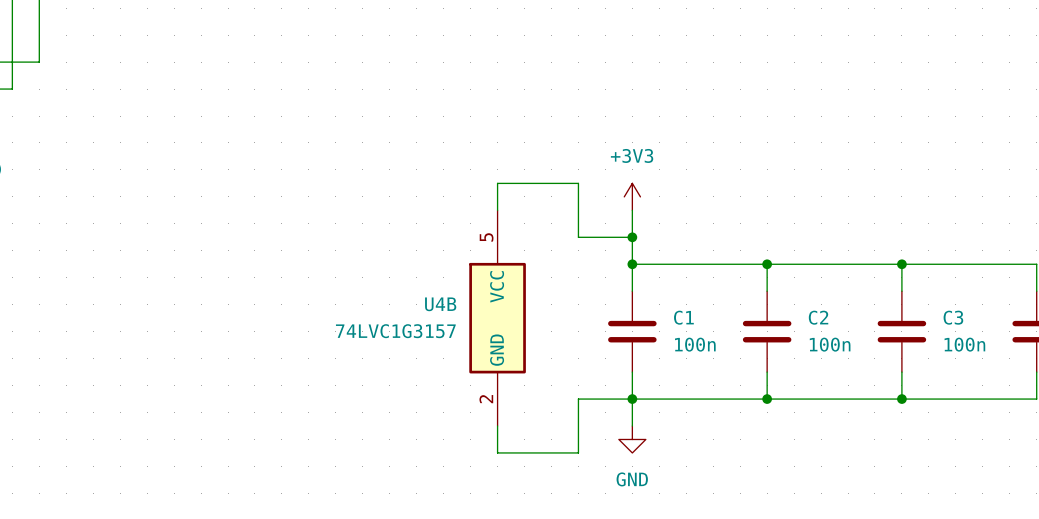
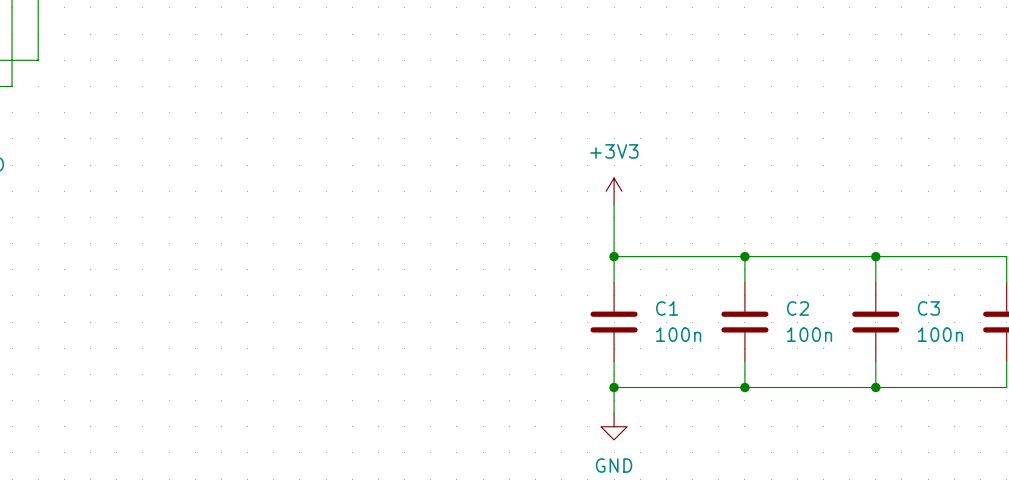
wire: (497, 210) (497, 183) (578, 183) (578, 237) (632, 237) -> none
junction: (632, 237) -> none
U4B: 74LVC1G3157 (497, 318) -> none
wire: (632, 399) (578, 399) (578, 452) (497, 452) (497, 426) -> none

